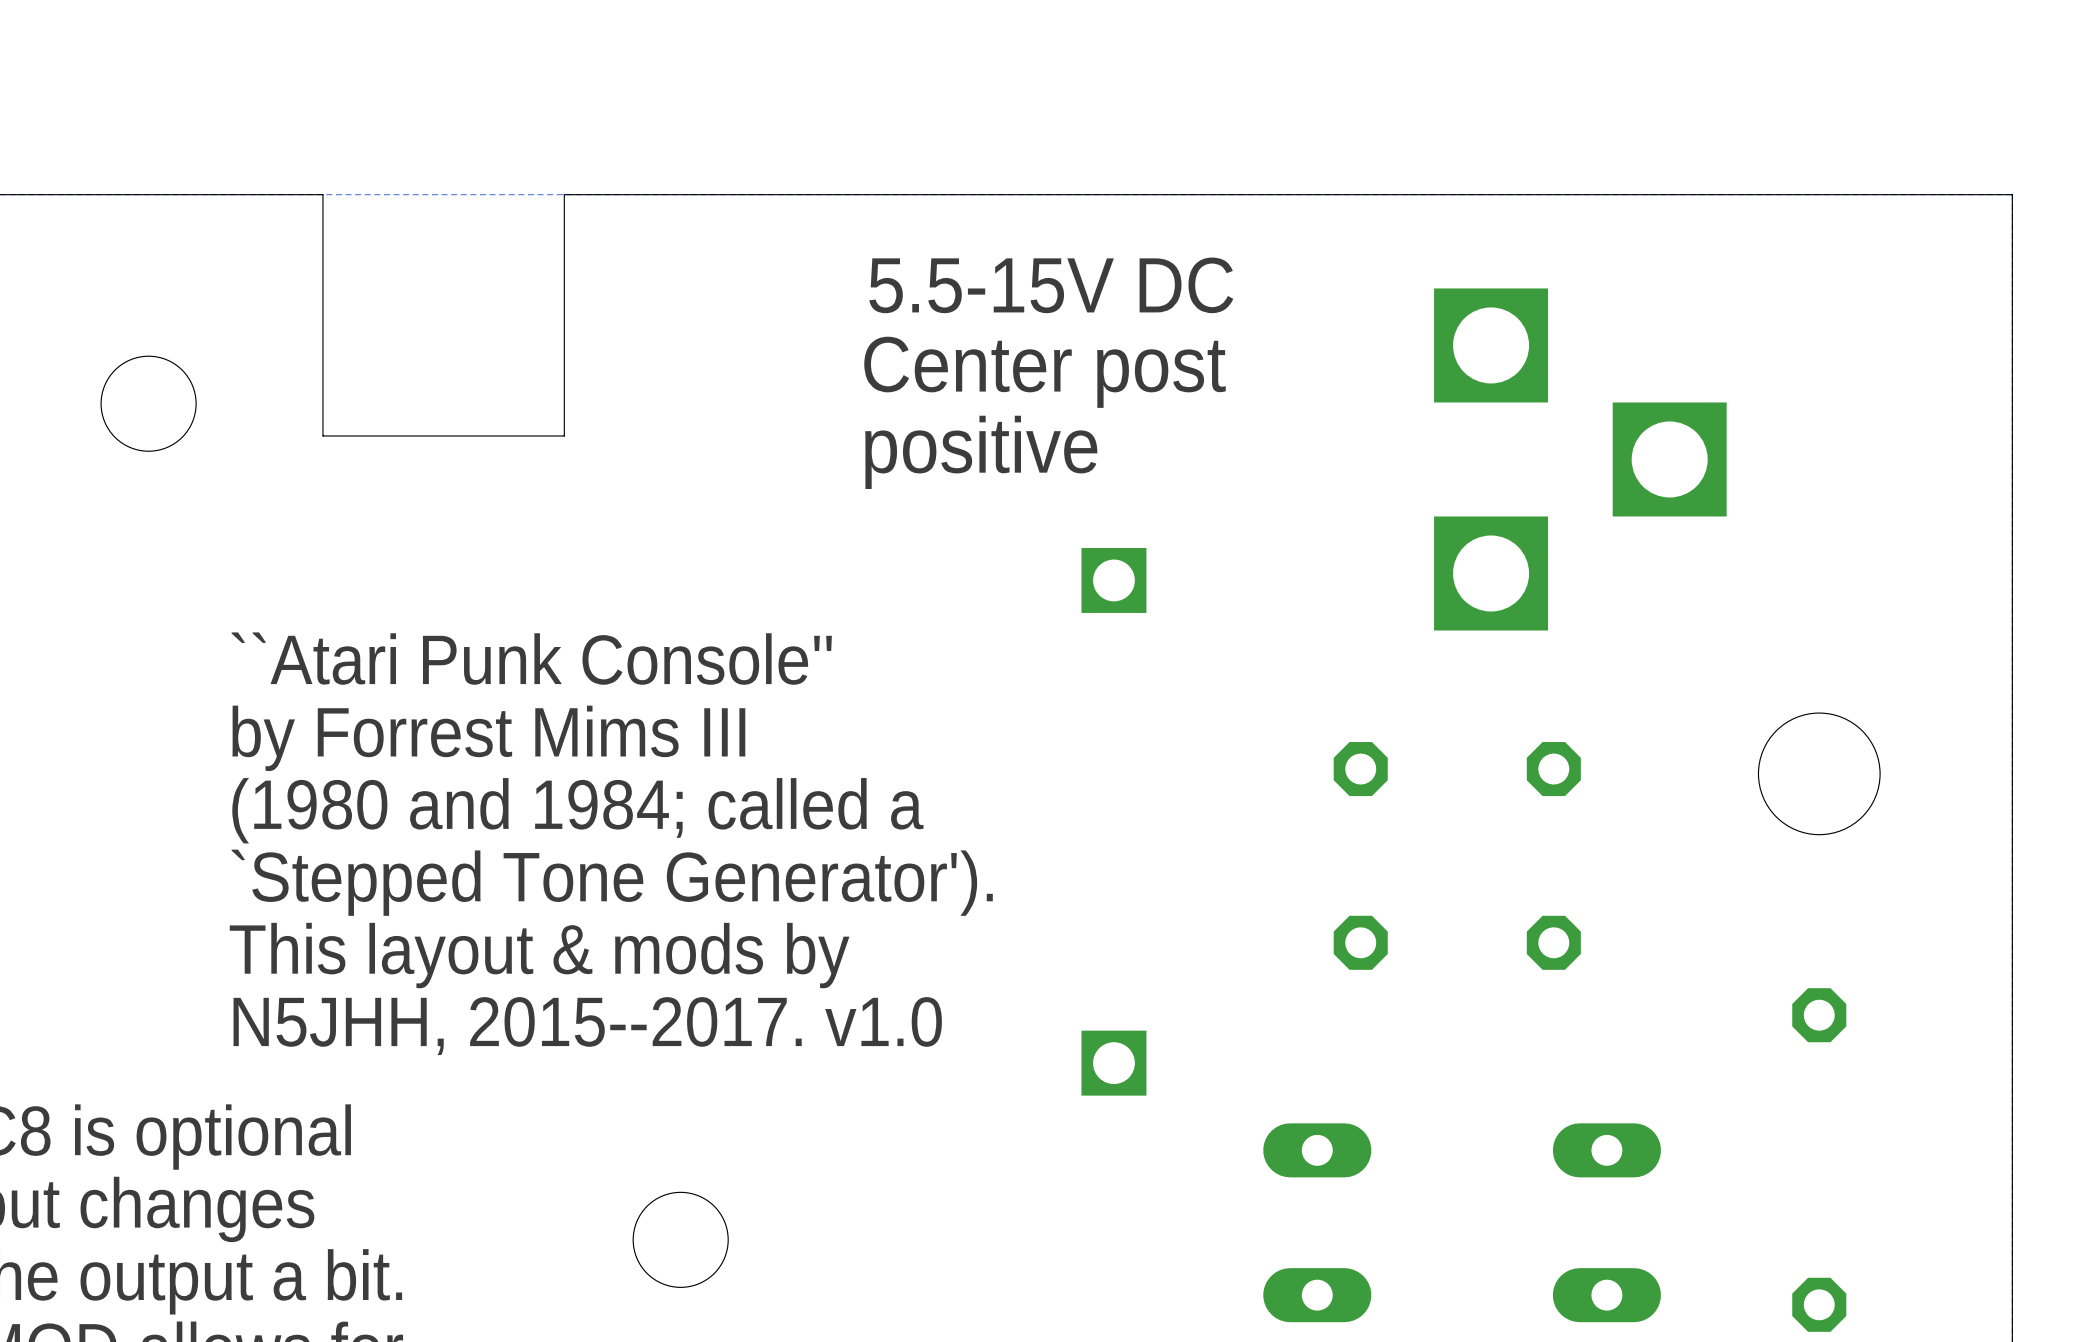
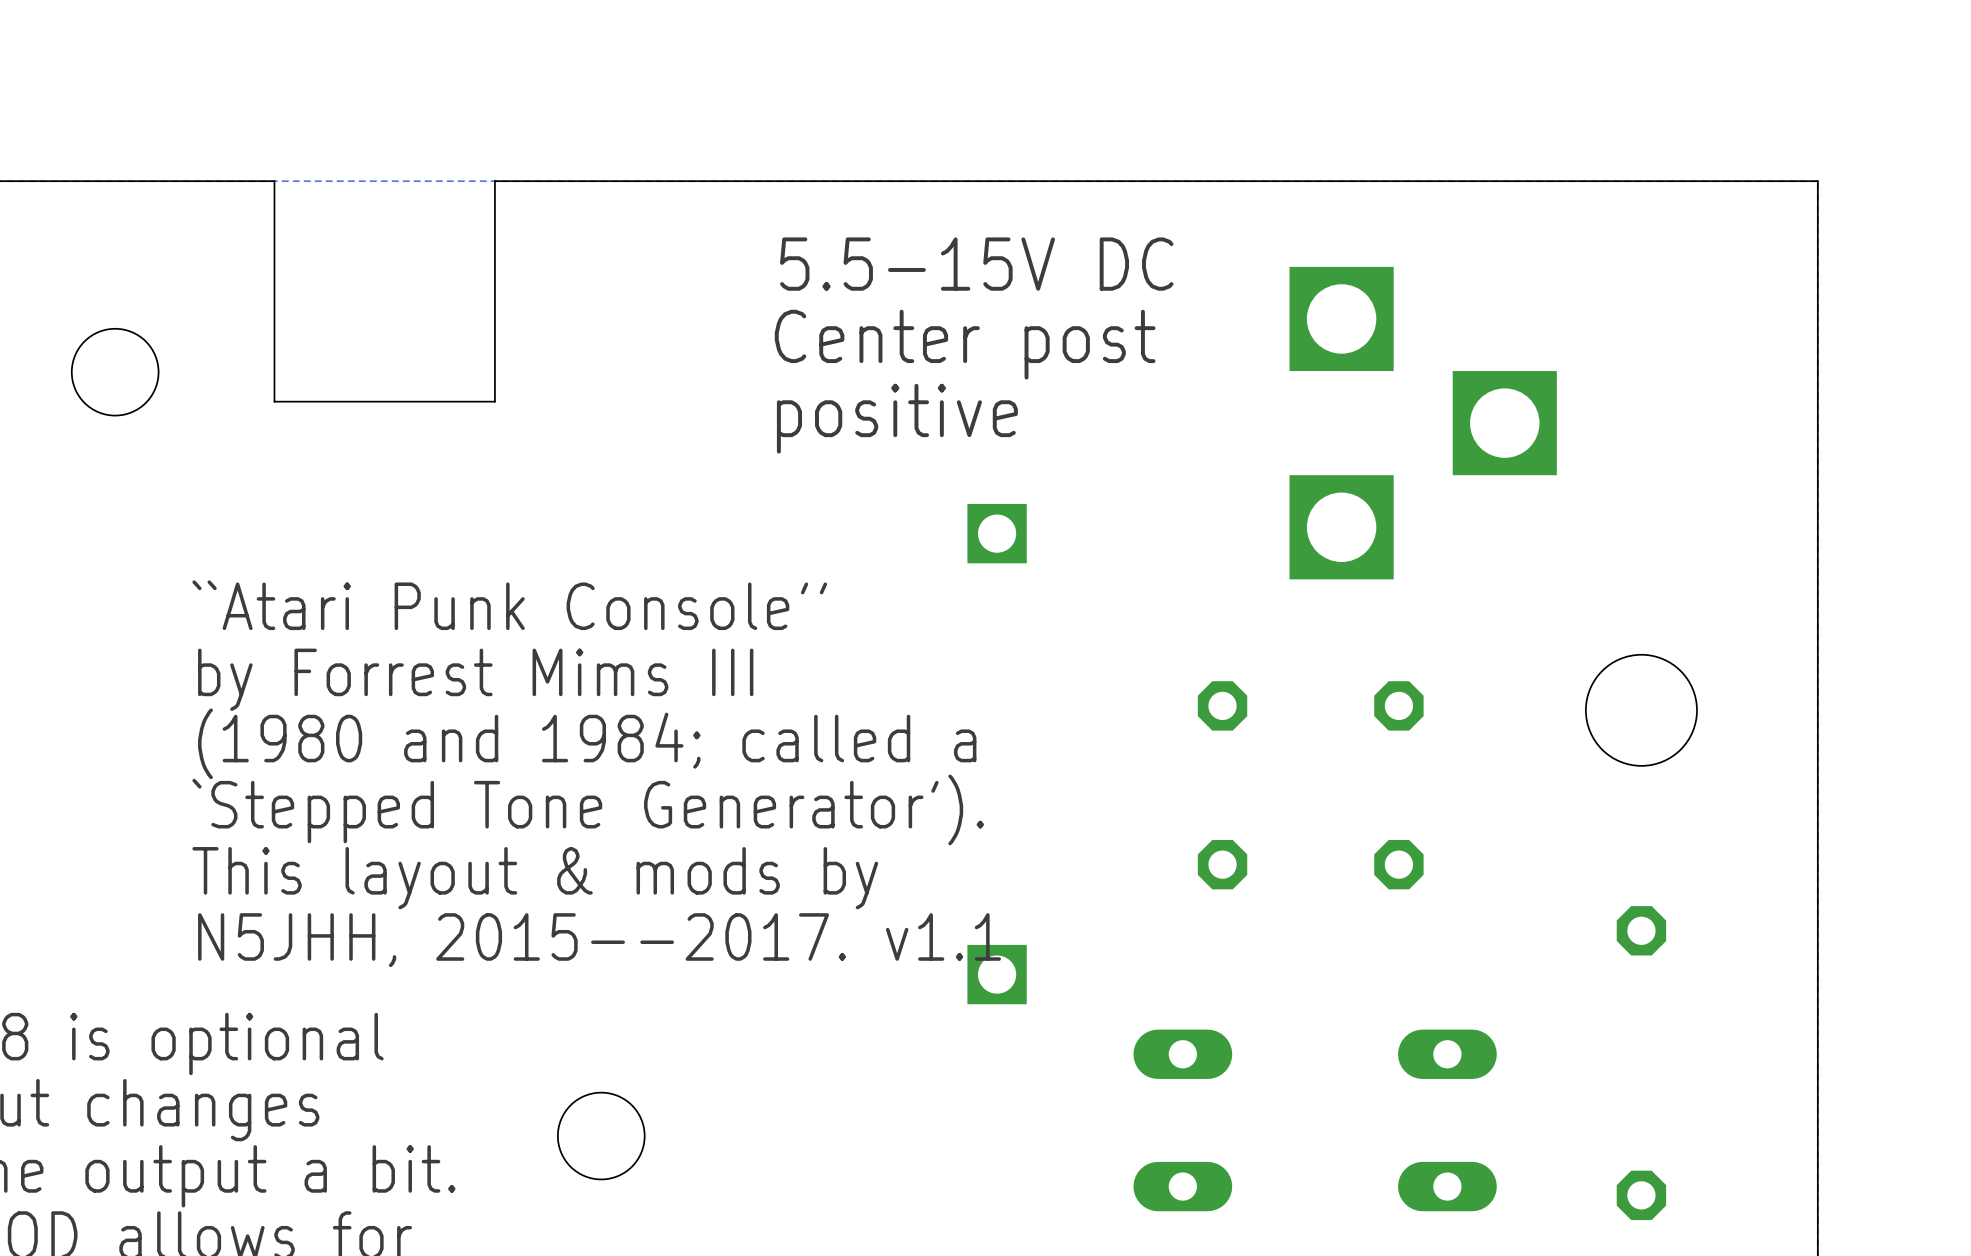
text: N5JHH, 2015--2017. v1.0 (587, 1026) -> N5JHH, 2015--2017. v1.1 (599, 940)

